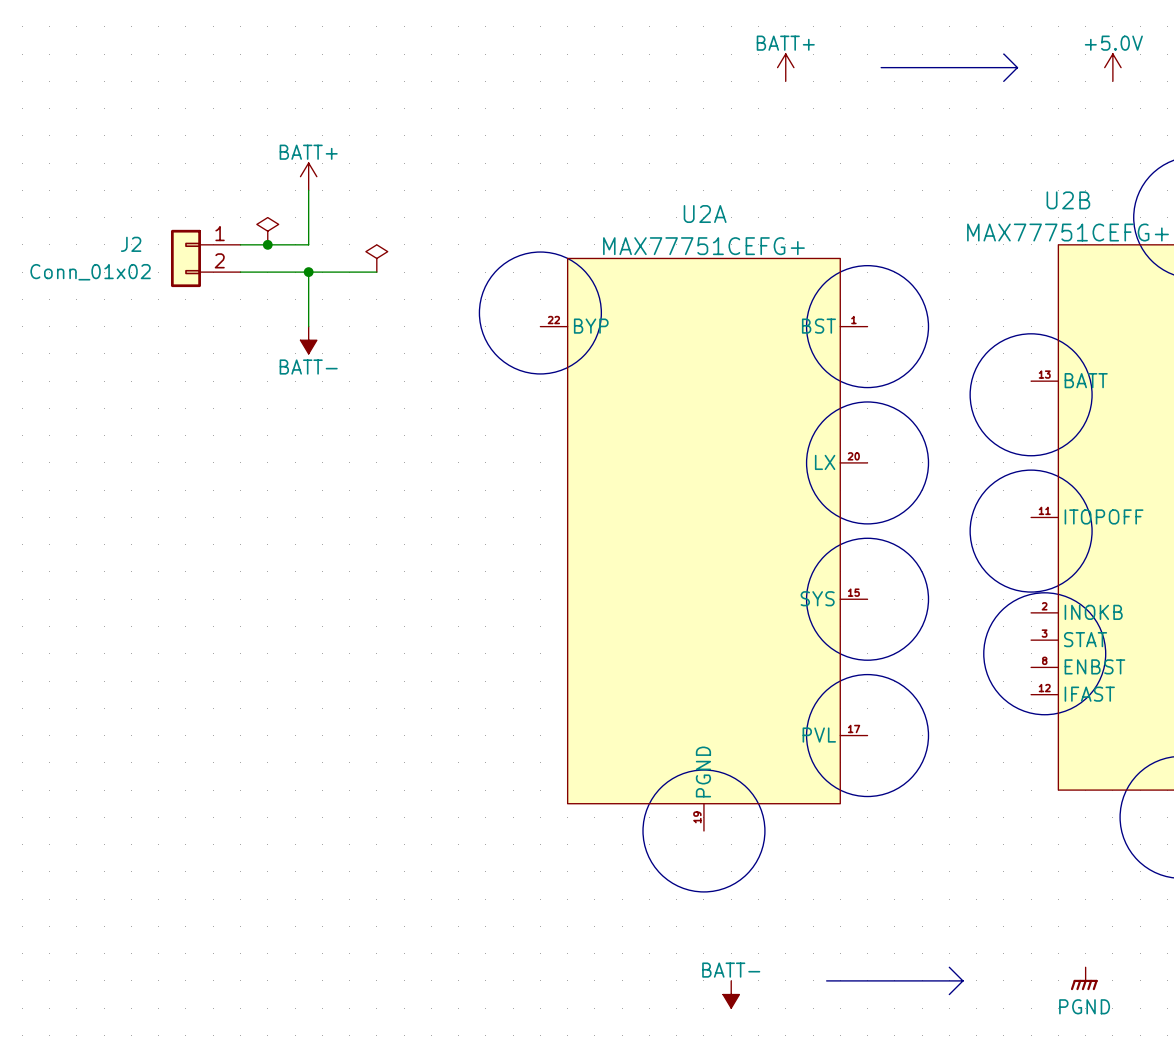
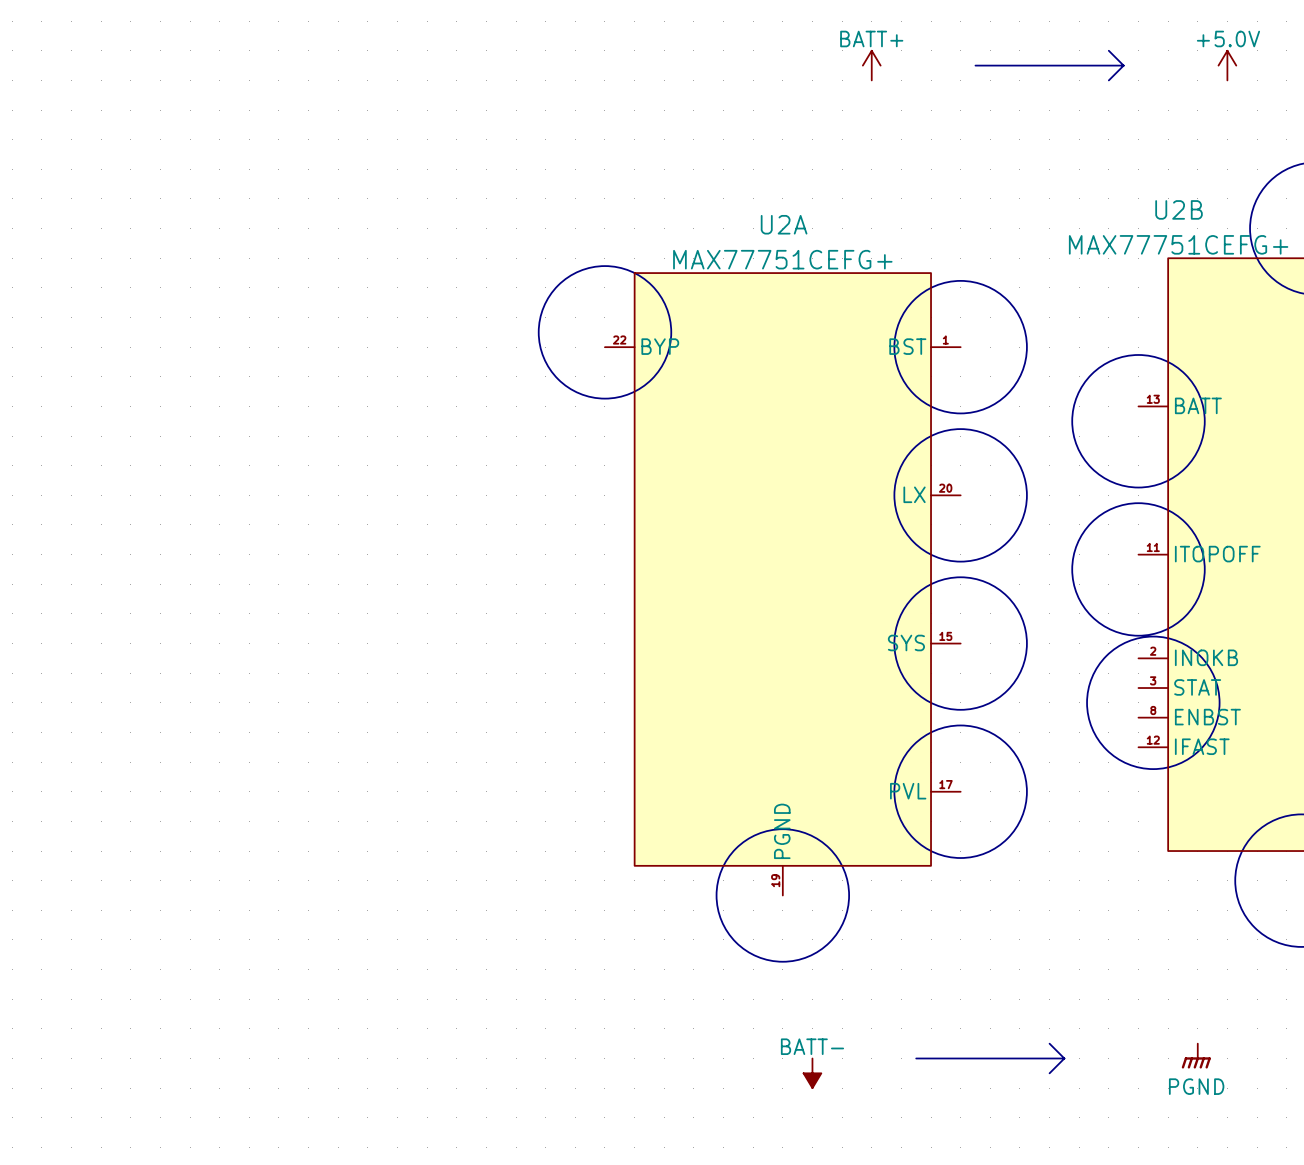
power symbol: BATT+ (308, 176) -> none
wire: (308, 190) (308, 244) (240, 244) -> none
power symbol: (267, 231) -> none
junction: (267, 244) -> none
J2: Conn_01x02 (205, 258) -> none
power symbol: (376, 258) -> none
wire: (240, 272) (376, 272) -> none
wire: (308, 272) (308, 326) -> none
junction: (308, 272) -> none
power symbol: BATT- (308, 340) -> none

